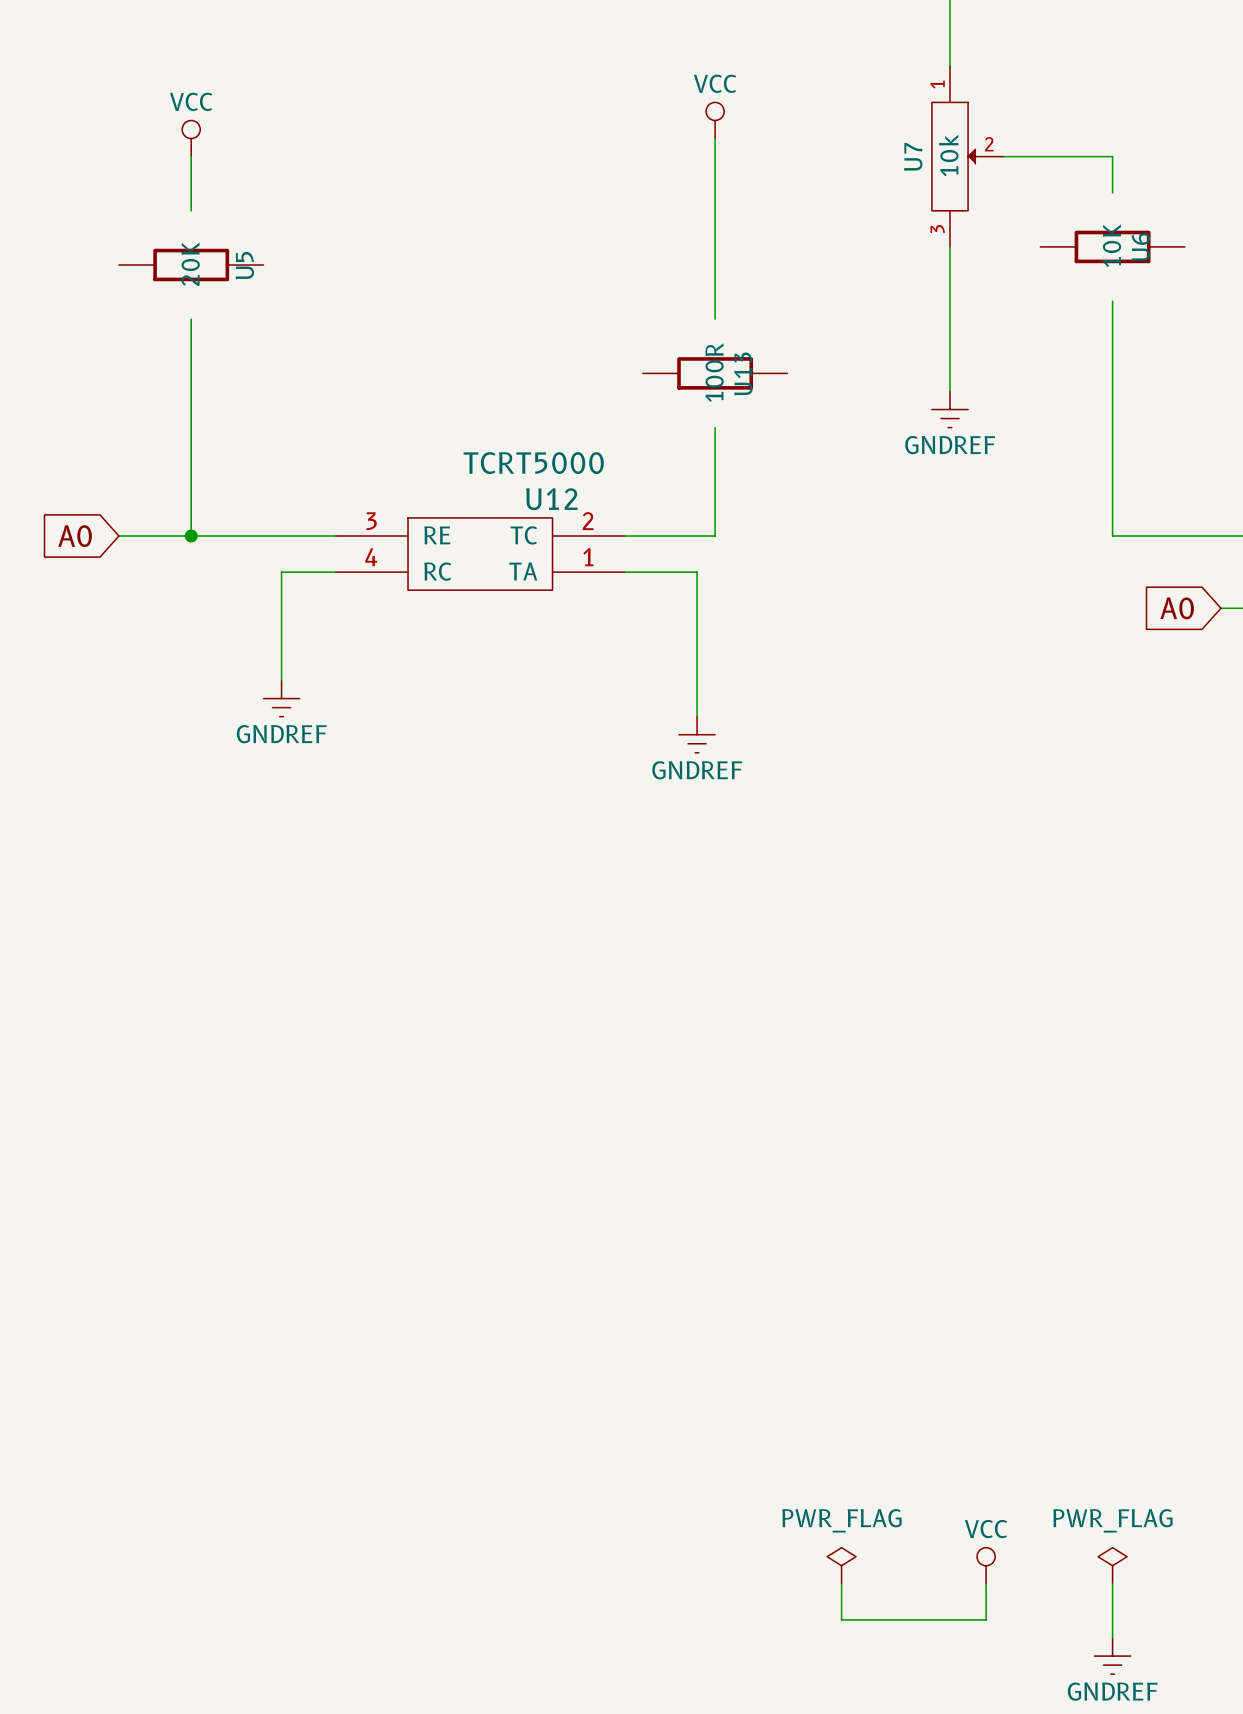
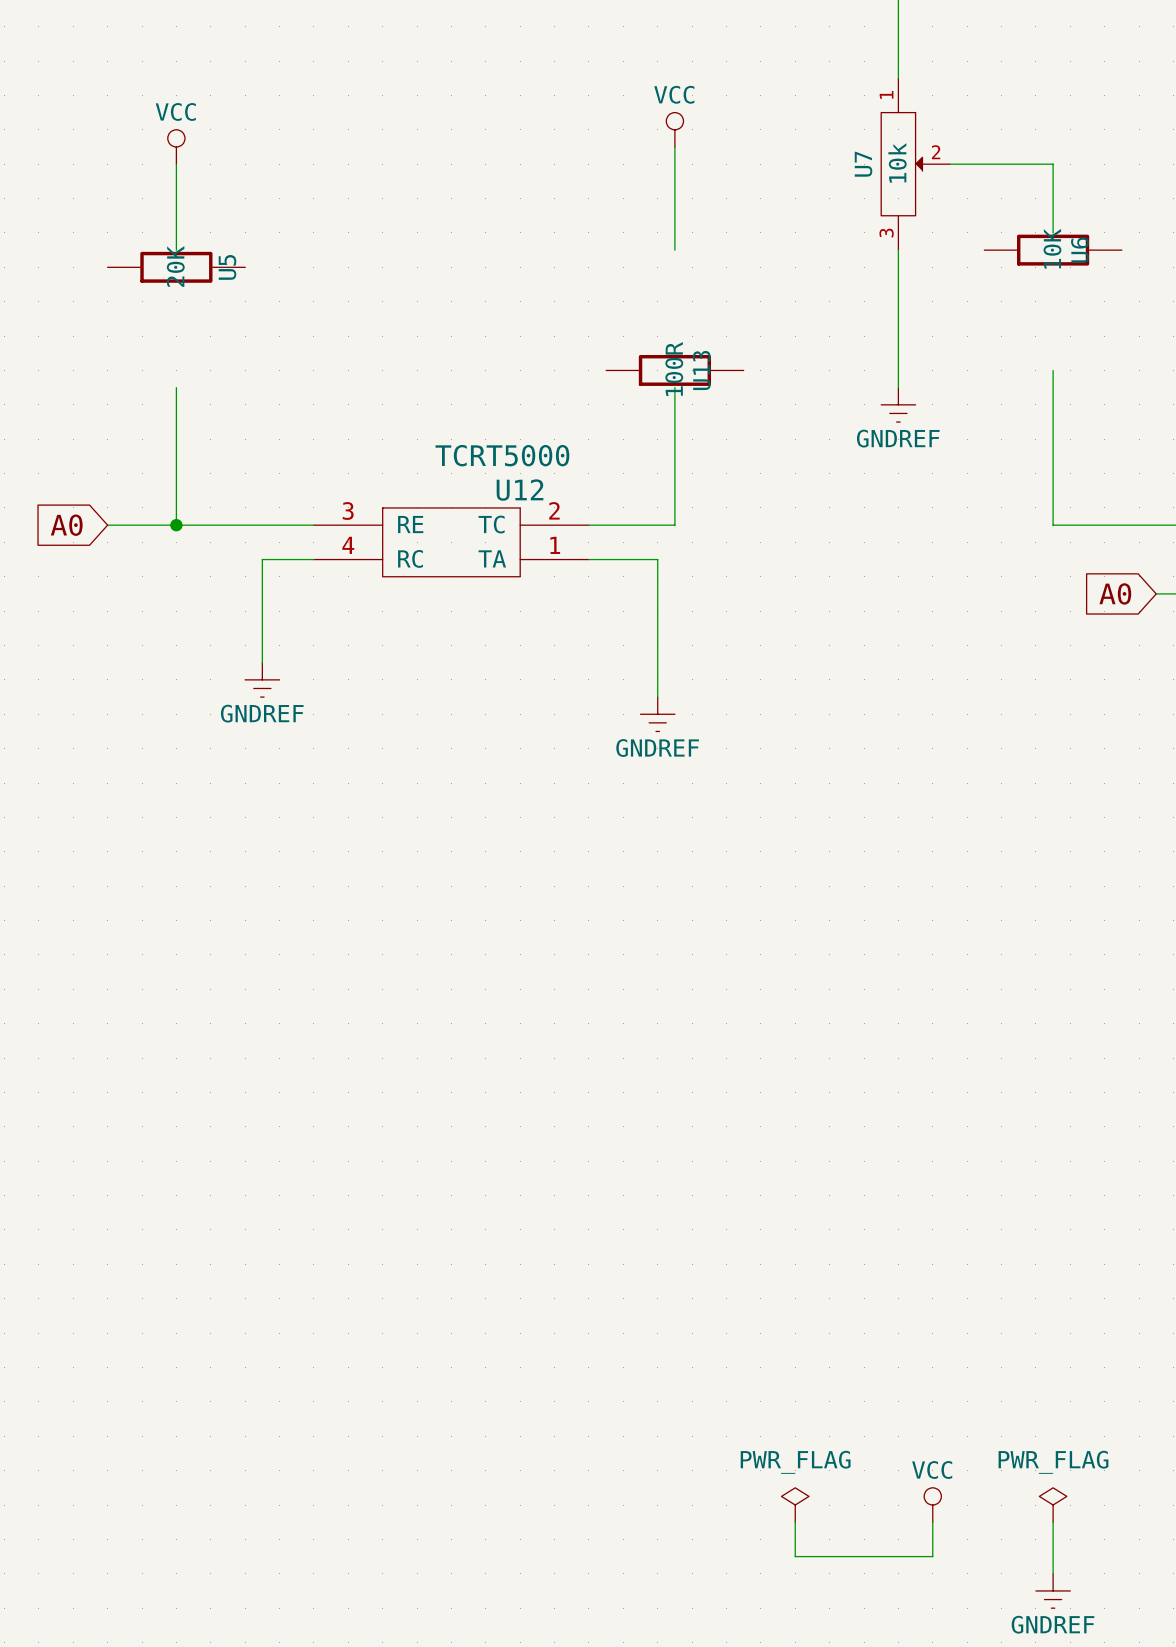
wire: none -> (1053, 198) (1053, 232)
wire: none -> (176, 215) (176, 250)
wire: (715, 246) (715, 319) -> none
wire: (1112, 301) (1112, 373) -> none
wire: (191, 319) (191, 391) -> none
wire: none -> (674, 387) (674, 422)

